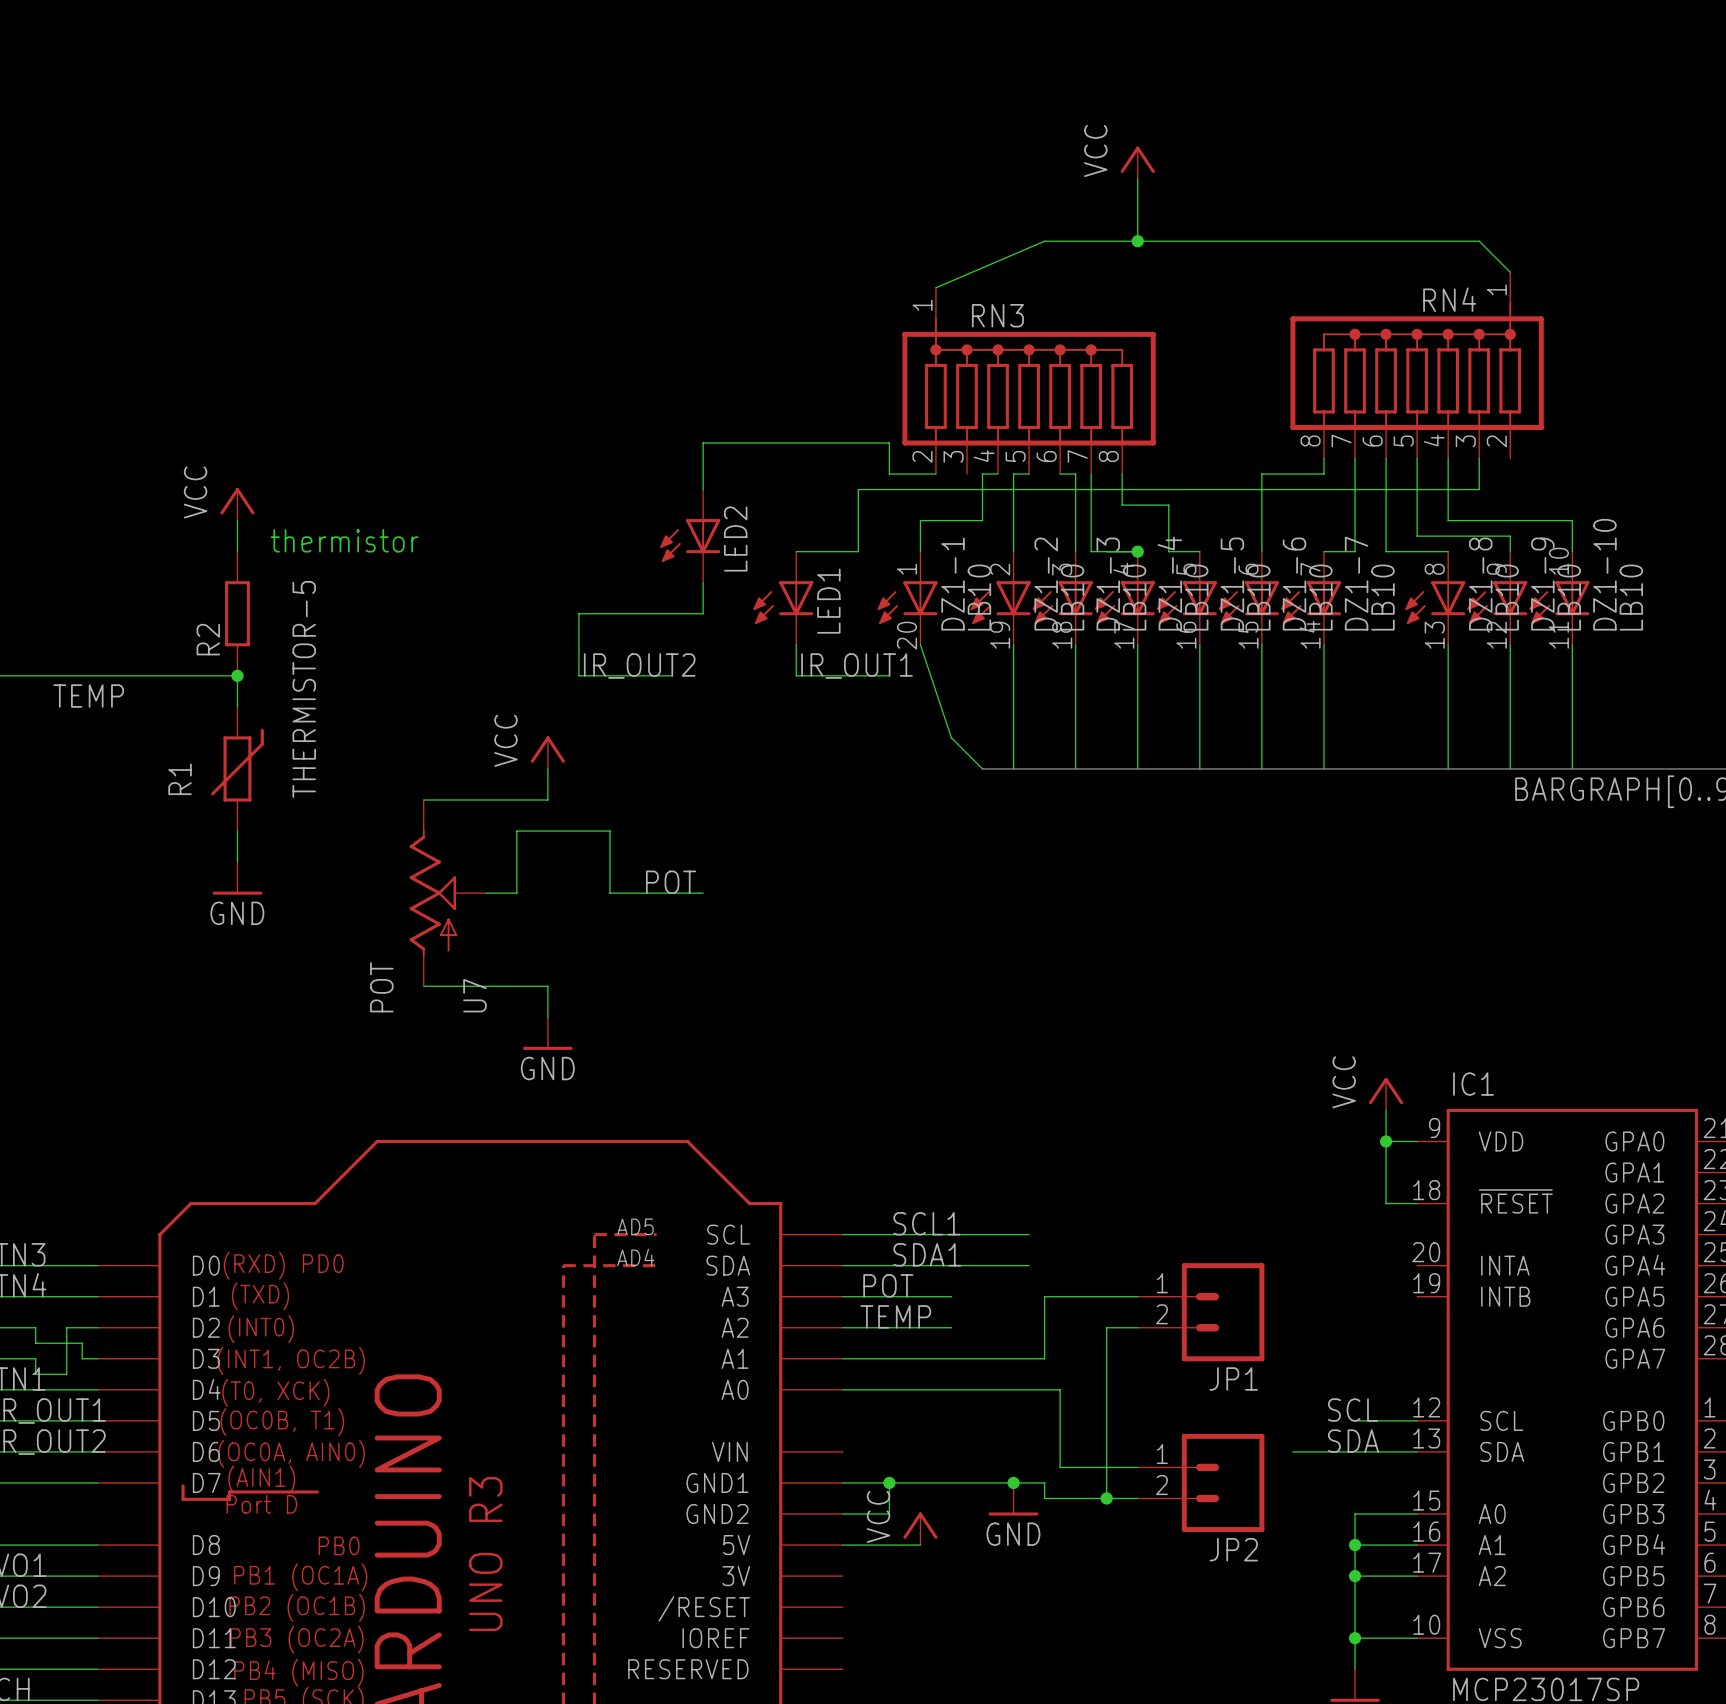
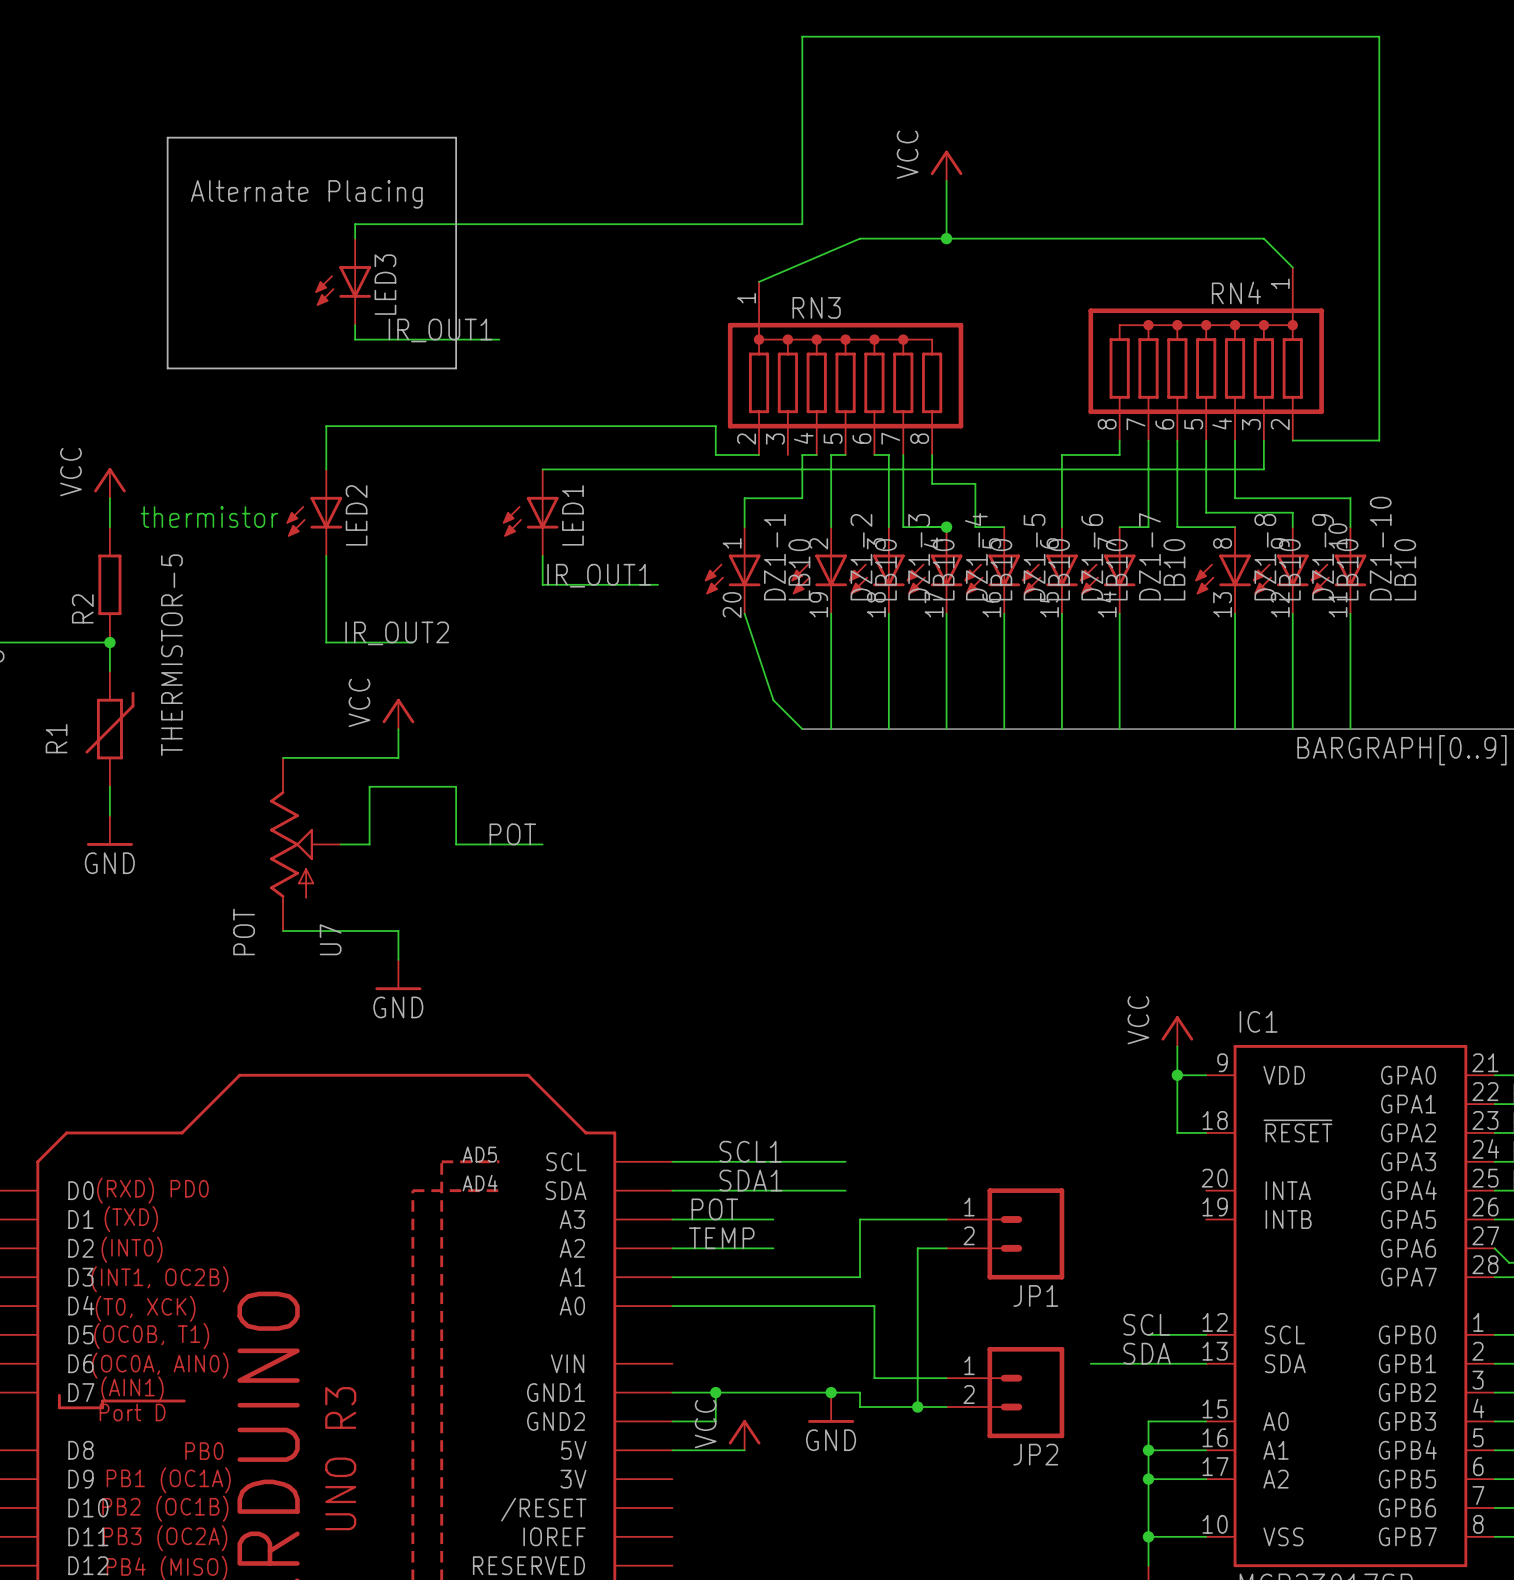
line: none -> (167, 137) (456, 137) (456, 368) (167, 368) (167, 137)
text: none -> Alternate Placing (306, 194)
wire: none -> (355, 238) (355, 224) (802, 224) (802, 36) (1379, 36) (1379, 440) (1292, 440)
LED3: none -> (343, 281)
wire: none -> (355, 325) (355, 339) (499, 339)
label: none -> IR_OUT1 (440, 330)
wire: (703, 443) (703, 489) -> (542, 426) (326, 426) (326, 469)
wire: (858, 489) (858, 551) (796, 551) -> (686, 469) (542, 469)
LED2: none -> (314, 512)
LED2 name: LED2 (735, 539) -> LED1 (572, 515)
wire: none -> (326, 555) (326, 642) (412, 642)
LED1: (783, 598) -> none
wire: (703, 613) (578, 613) (578, 675) (672, 675) -> (542, 584) (658, 584)
wire: (796, 644) (796, 675) (889, 675) -> none
label position: IR_OUT2 (639, 666) -> IR_OUT2 (397, 633)
label position: IR_OUT1 (857, 666) -> IR_OUT1 (599, 575)

